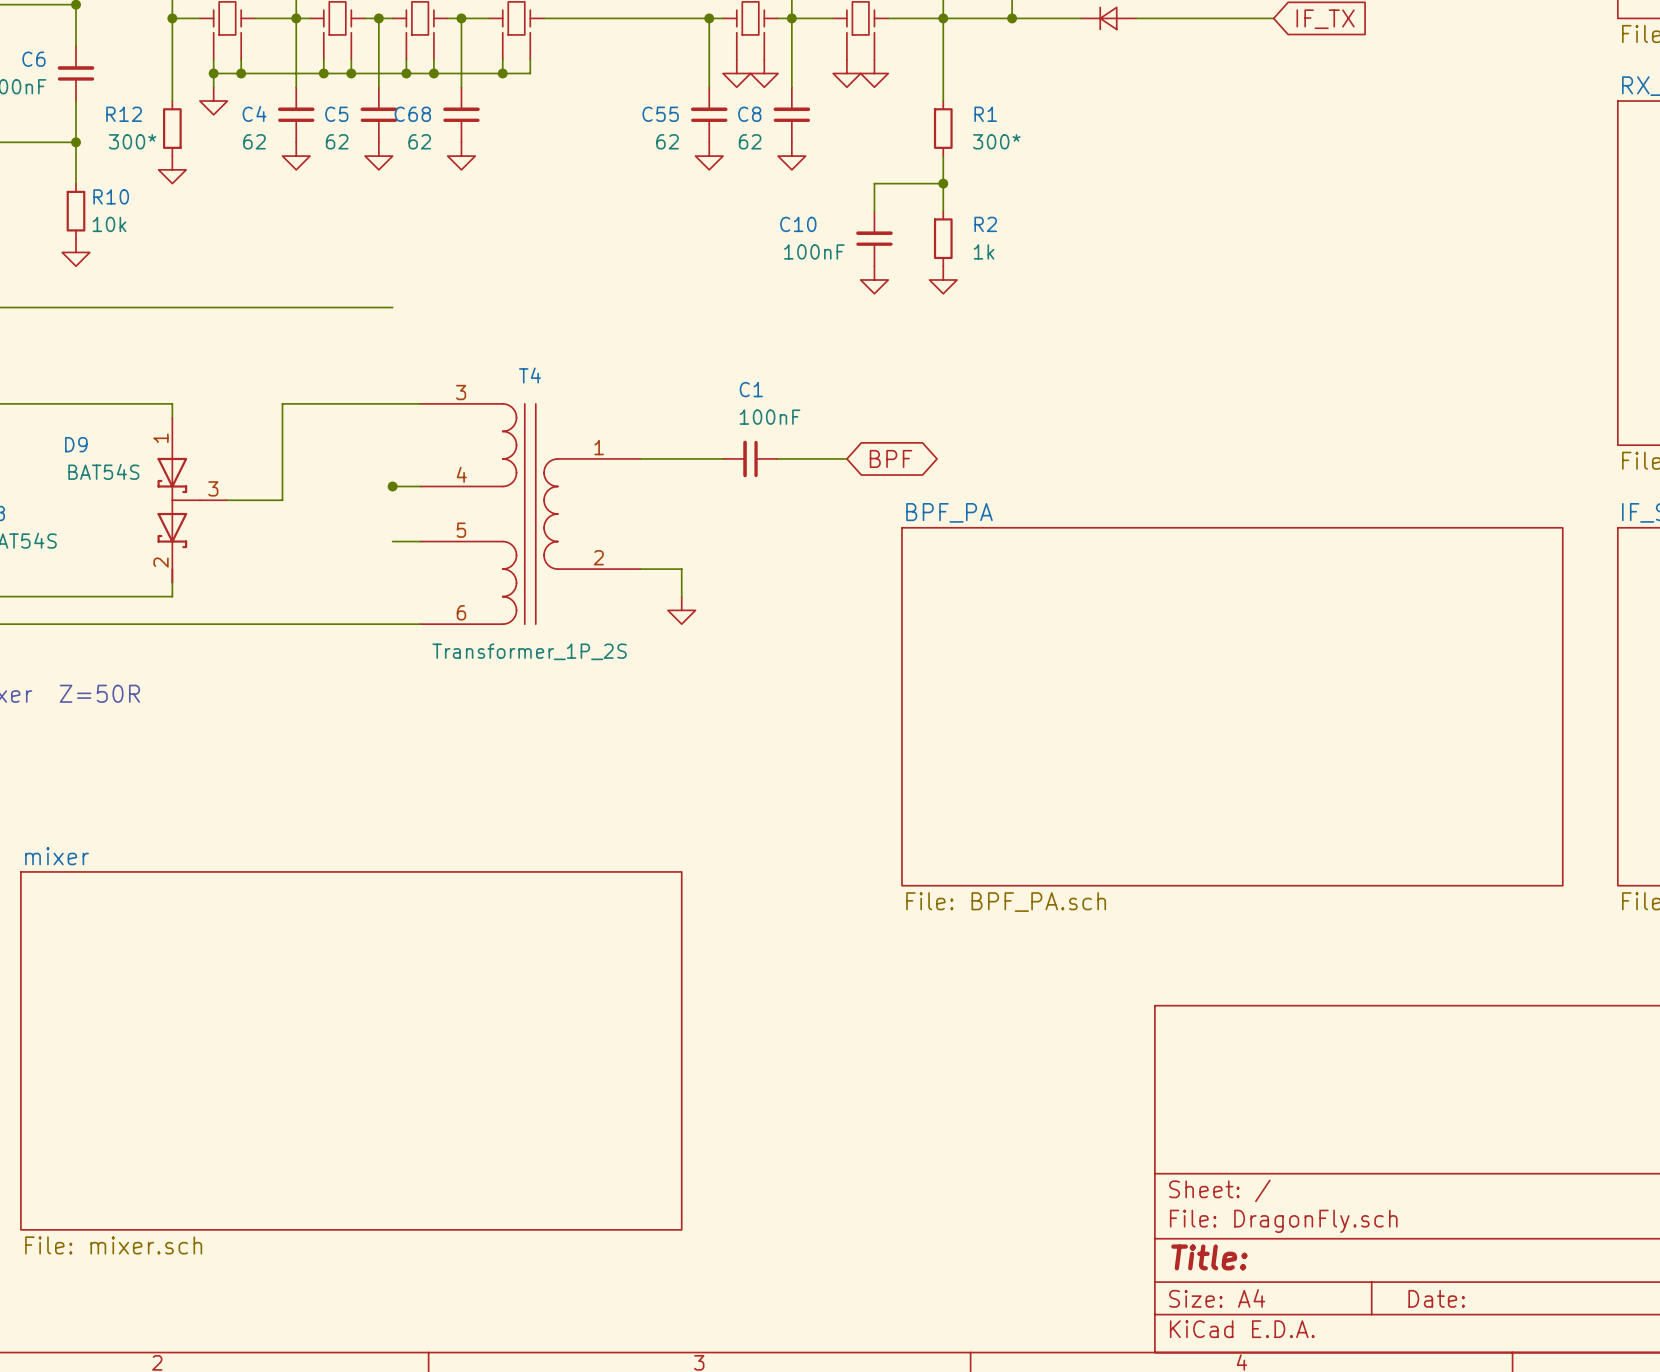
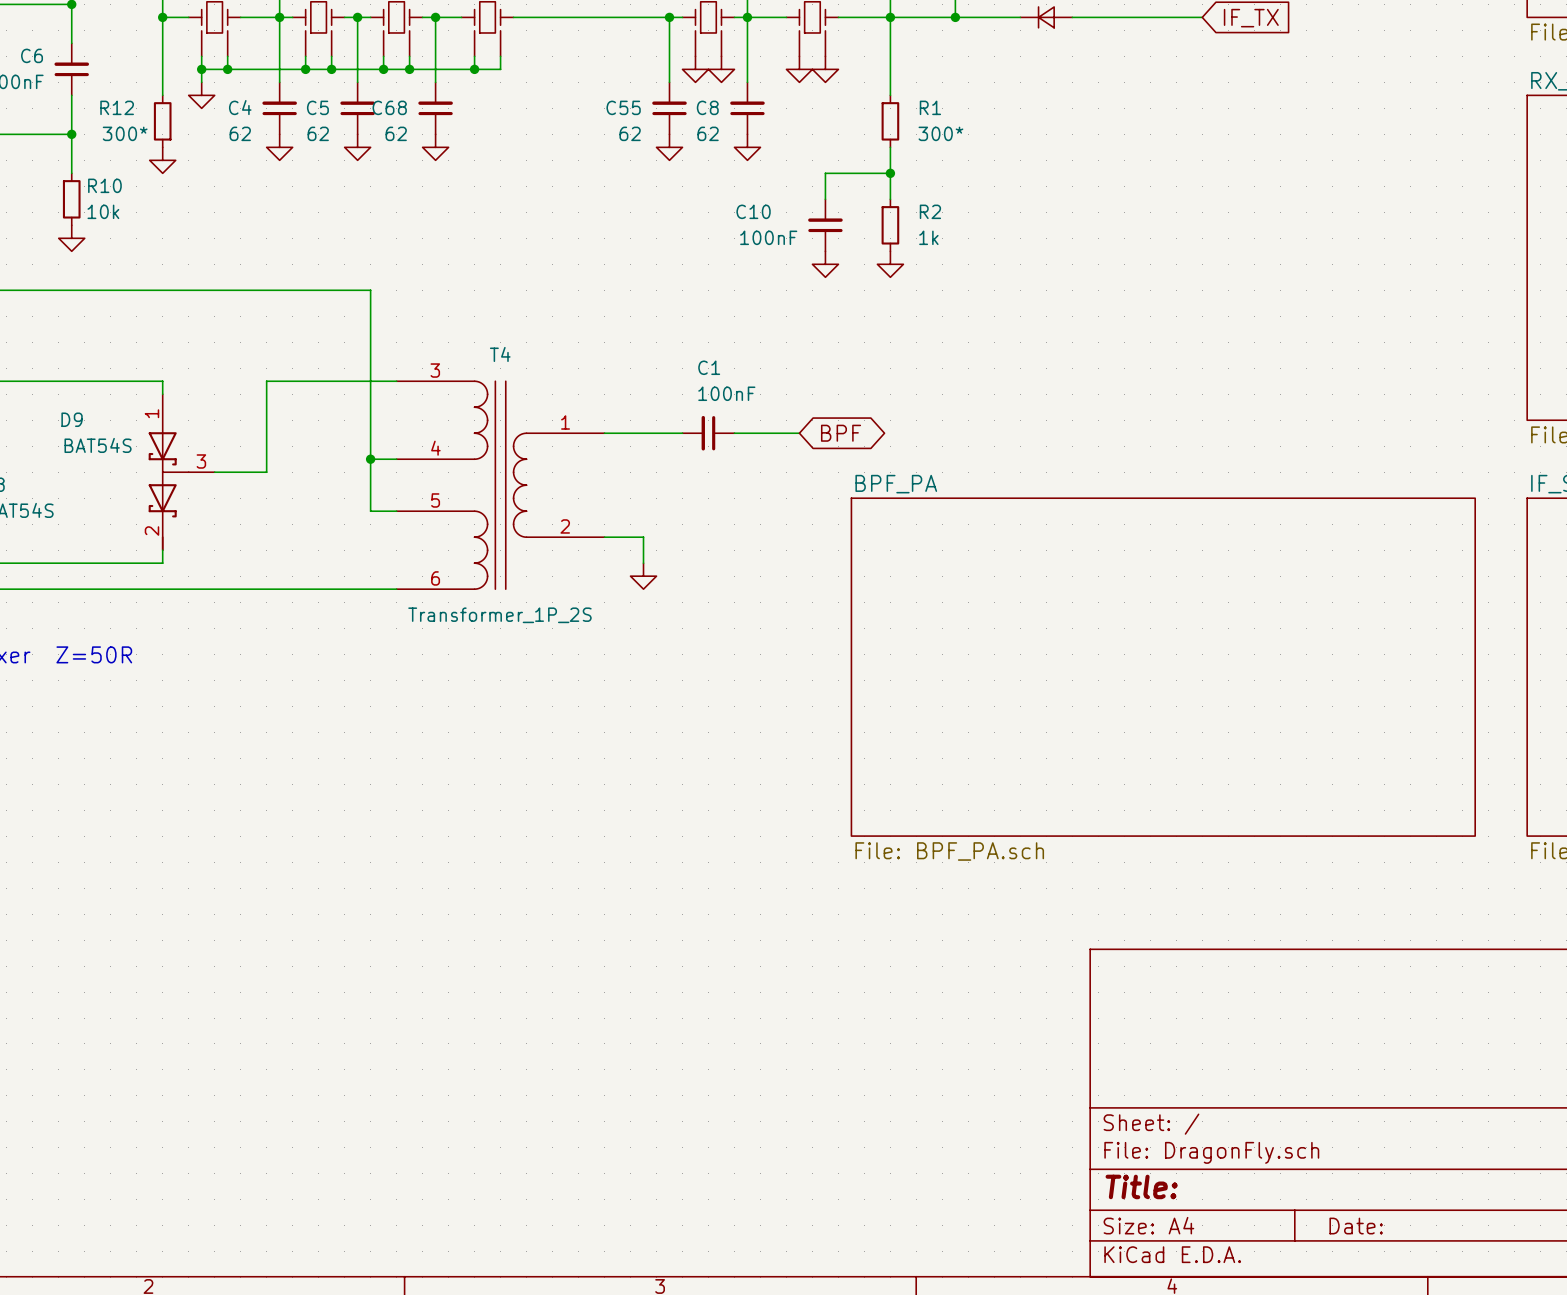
wire: none -> (370, 290) (370, 511)
sheet mixer: File: mixer.sch (351, 1050) -> none

